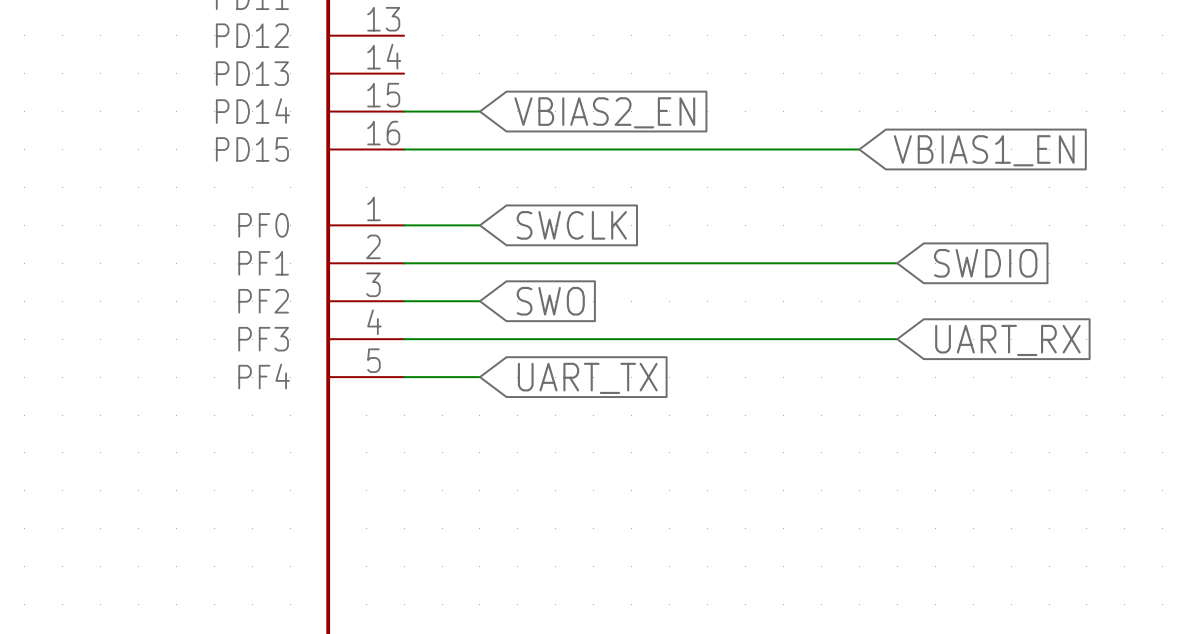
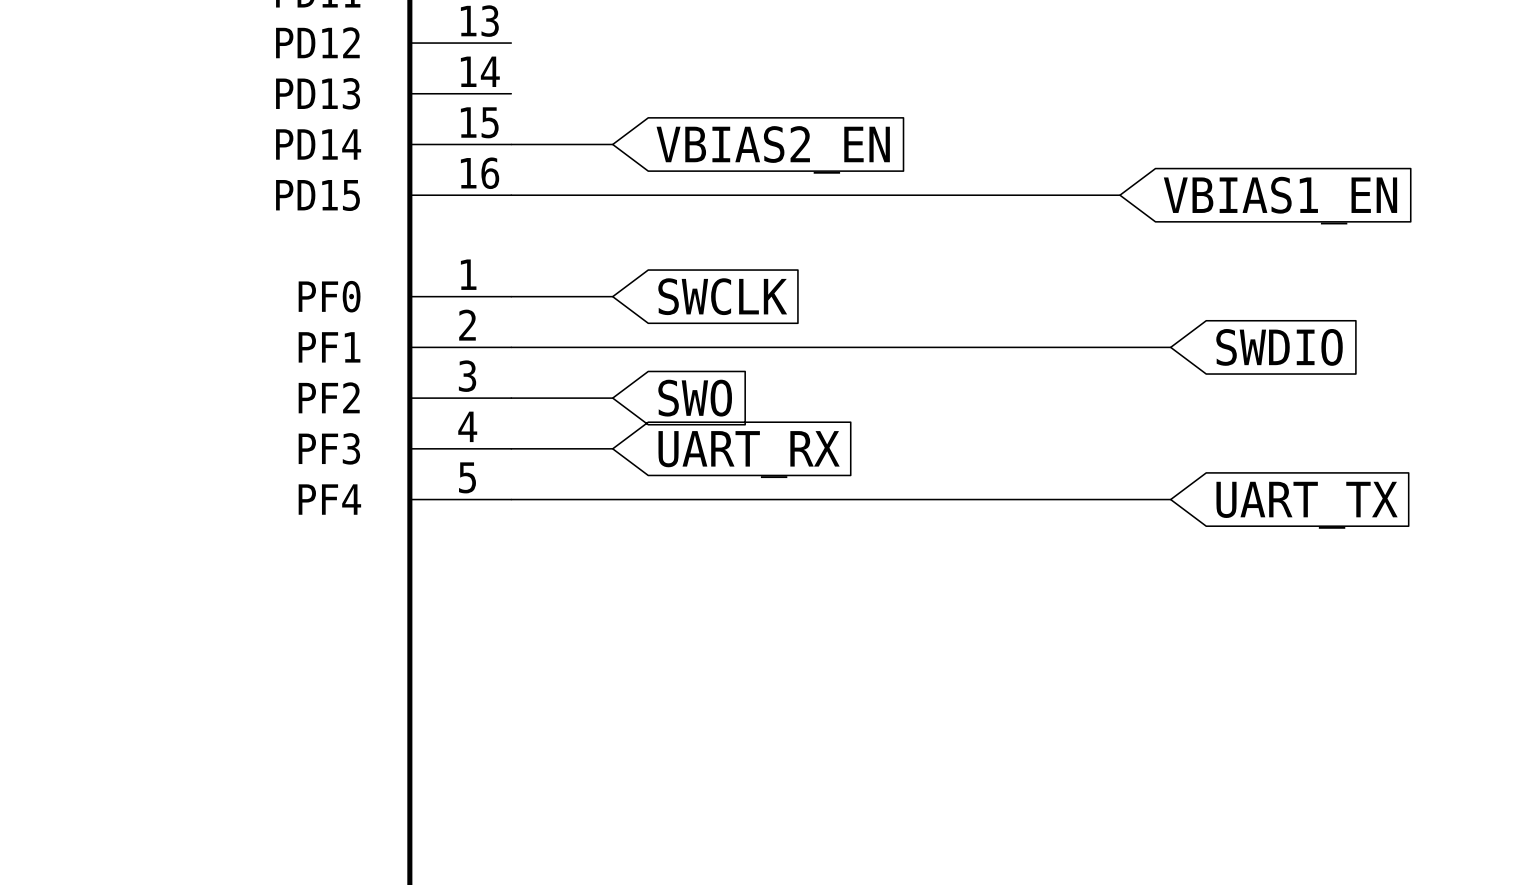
wire: (479, 339) (897, 339) -> (612, 499) (1170, 499)
global label: UART_RX (1007, 340) -> UART_TX (1307, 505)
global label: UART_TX (587, 378) -> UART_RX (749, 454)

